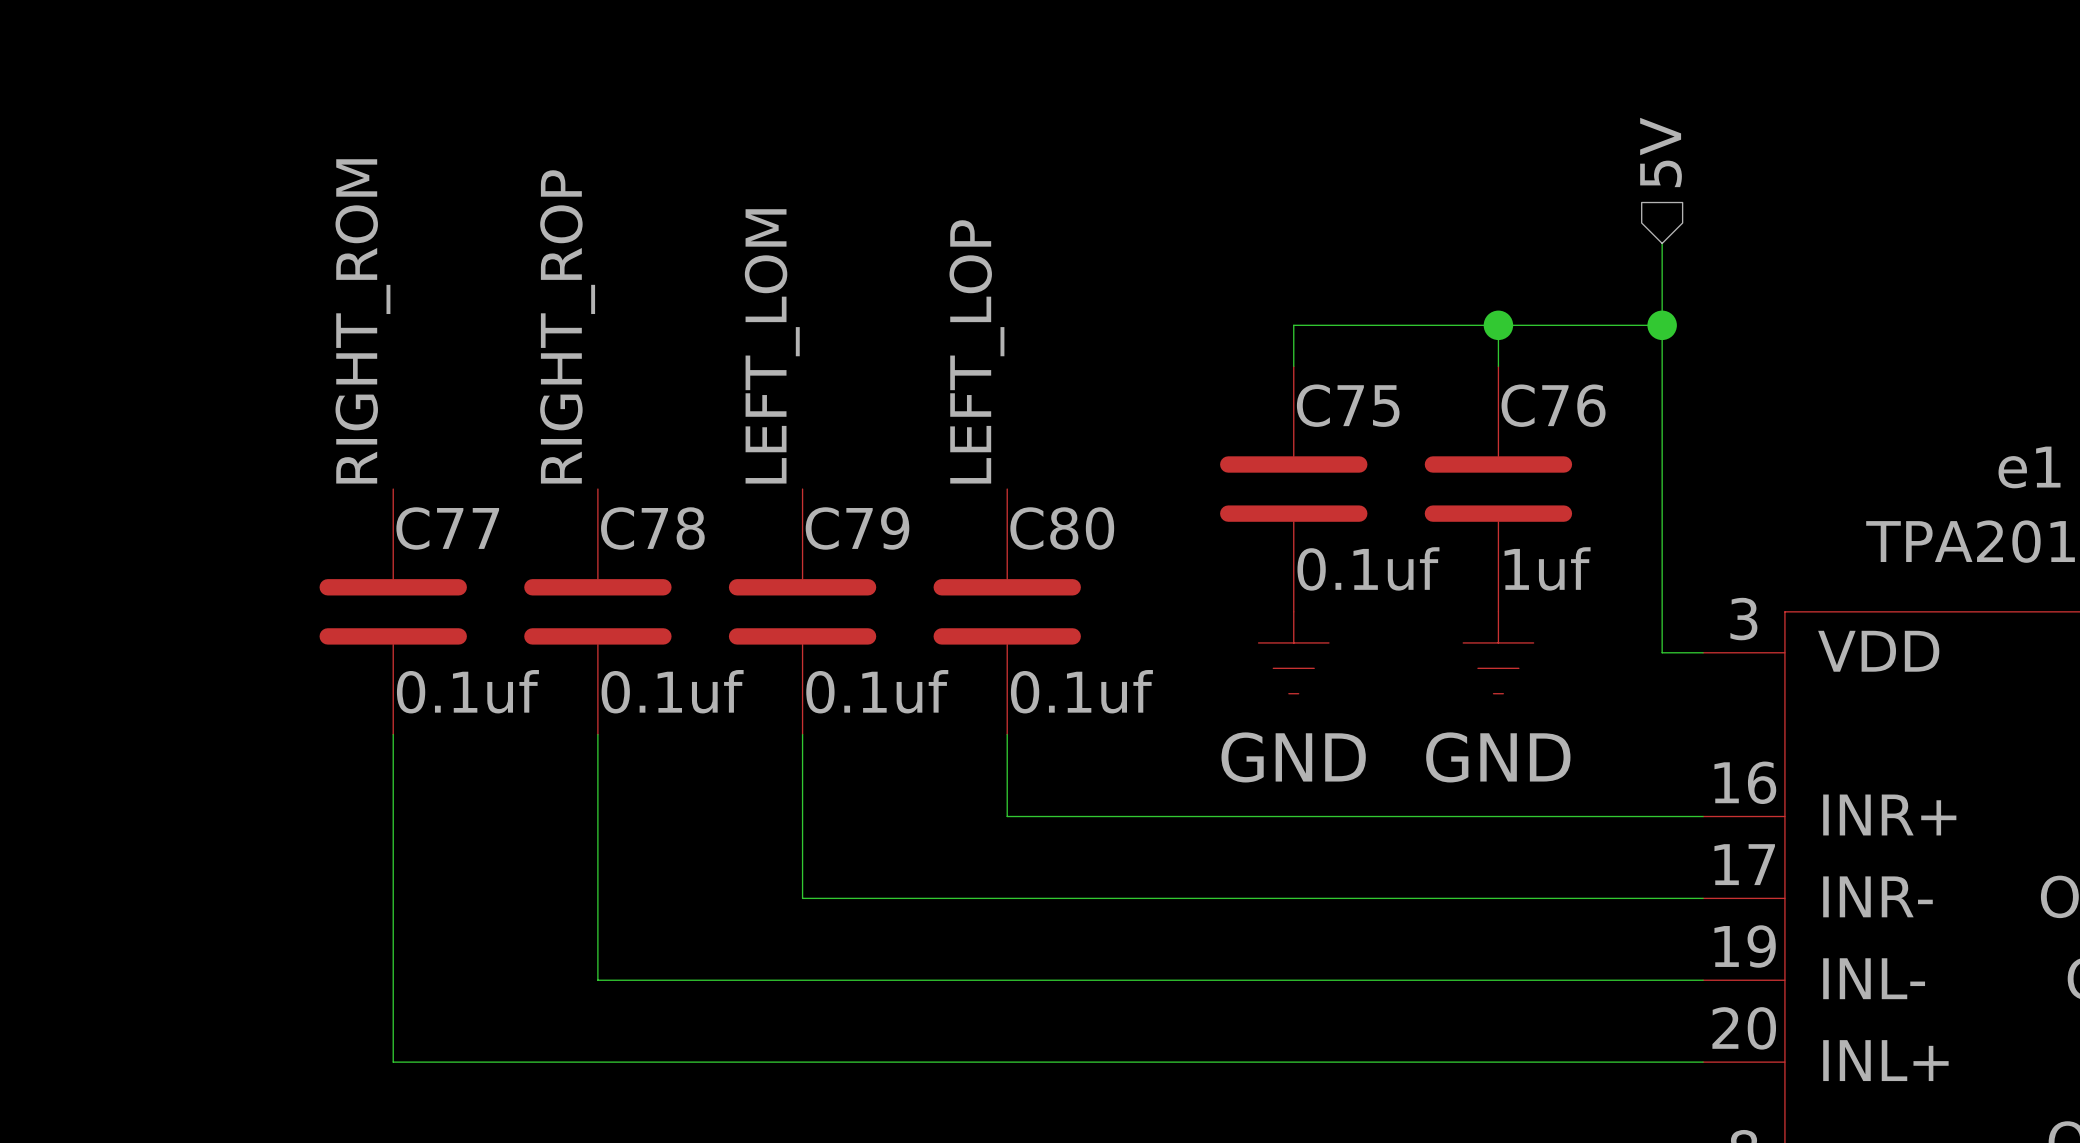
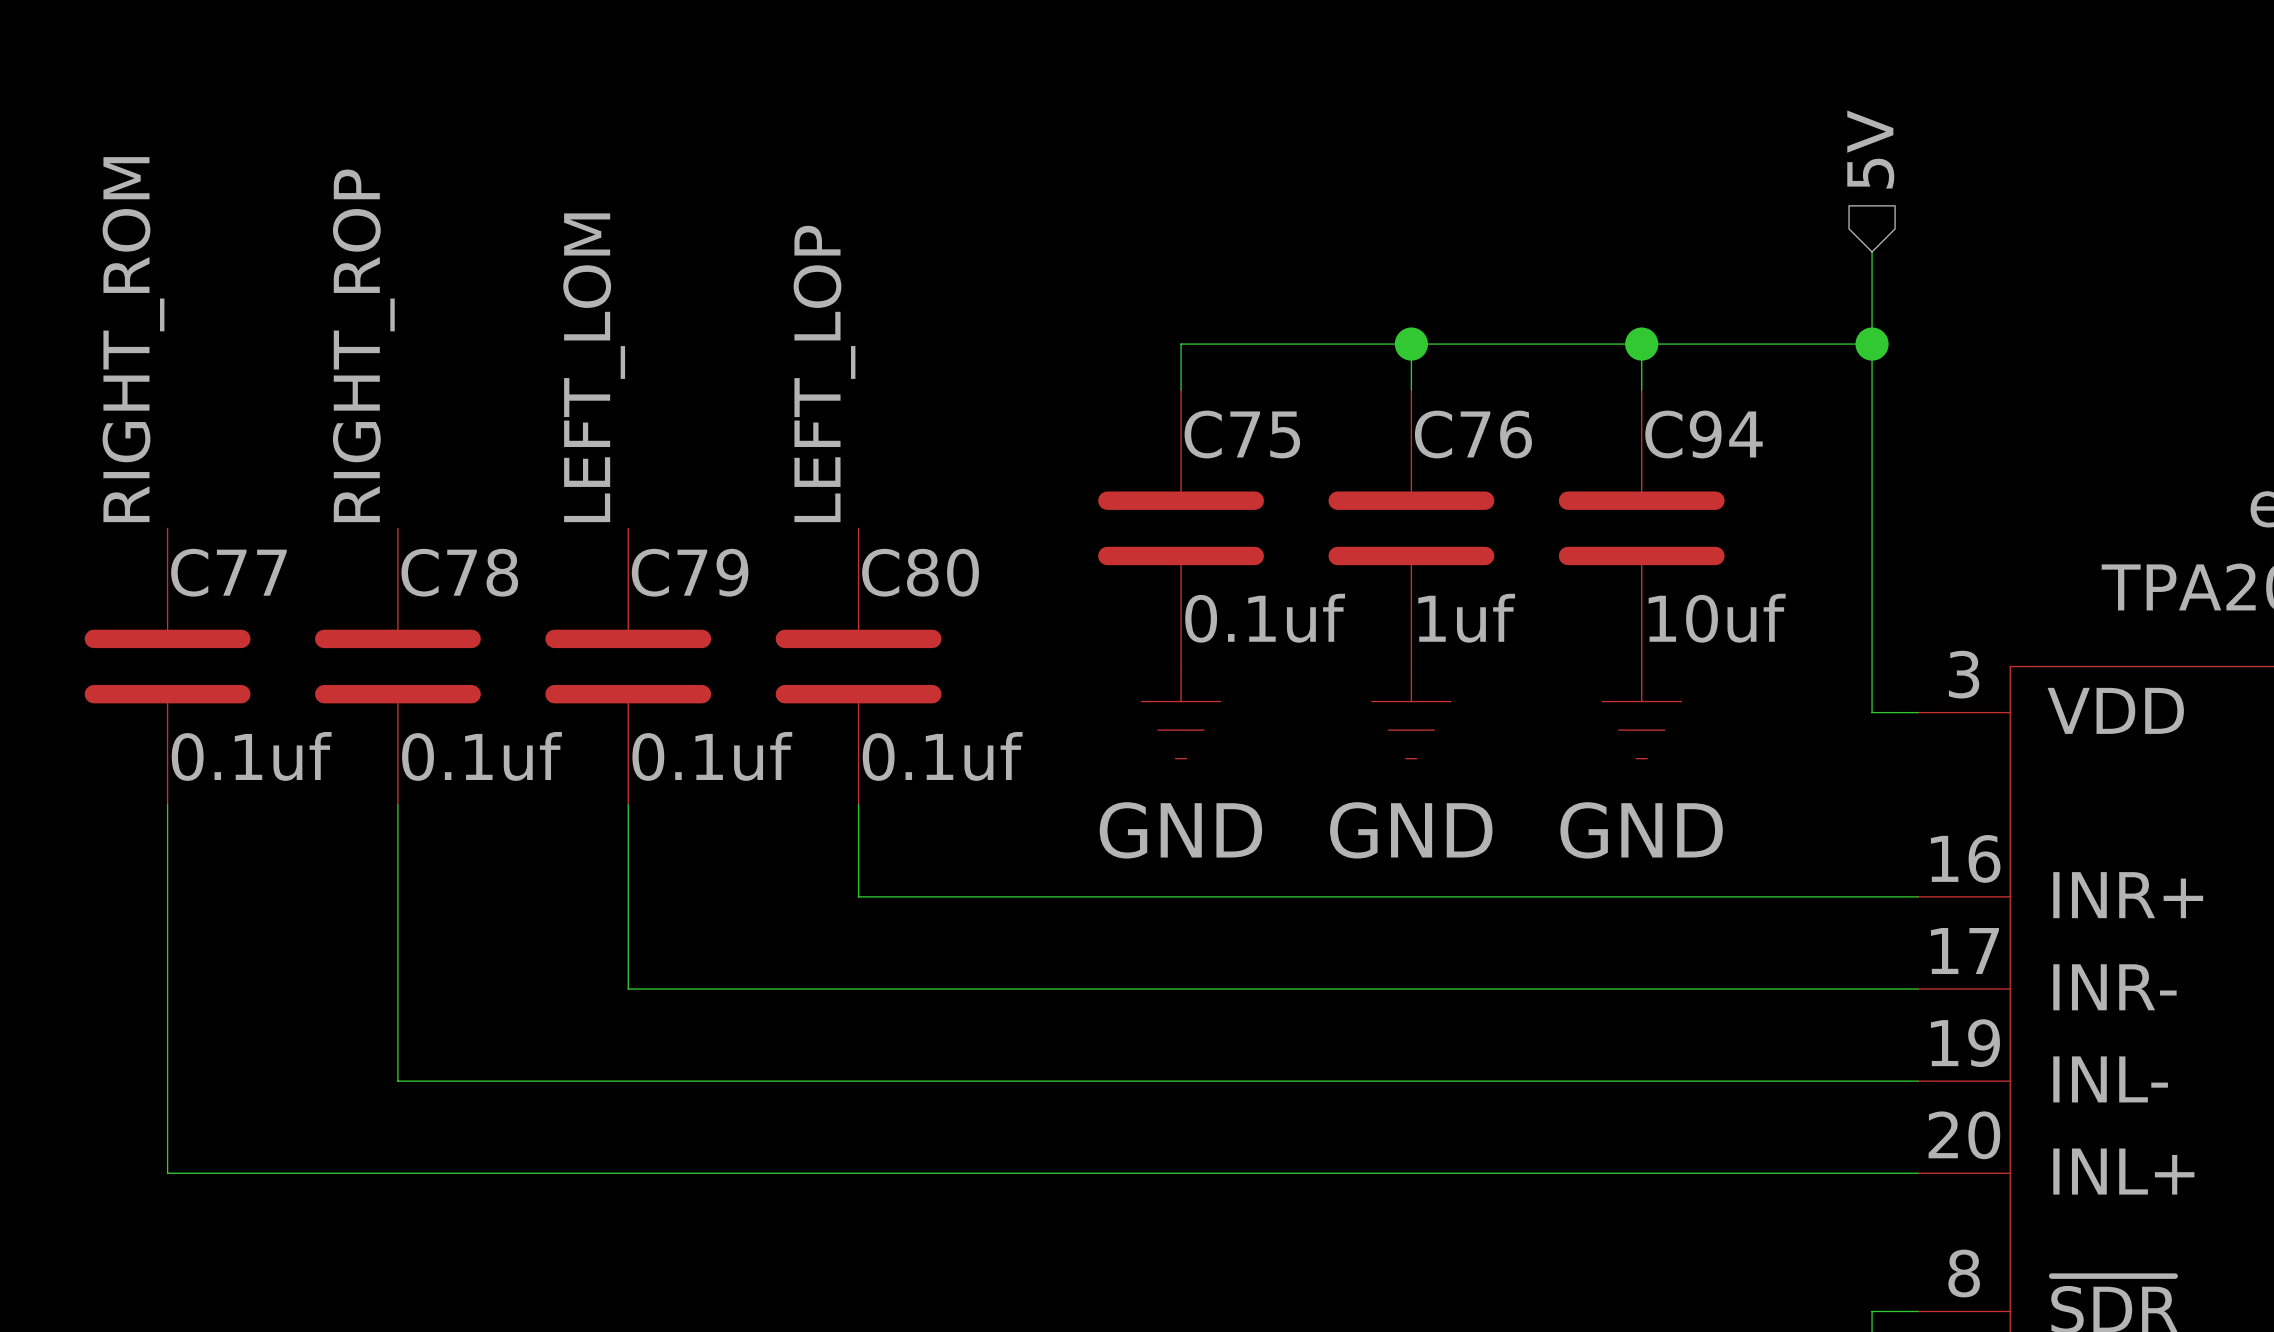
label position: RIGHT_ROM (362, 321) -> RIGHT_ROM (133, 339)
wire: none -> (1411, 344) (1411, 390)
junction: none -> (1411, 344)
wire: (1293, 325) (1293, 366) -> (1457, 344) (1181, 344) (1181, 390)
wire: (1498, 325) (1498, 366) -> (1641, 344) (1641, 390)
junction position: (1498, 325) -> (1641, 344)
label position: RIGHT_ROP (567, 326) -> RIGHT_ROP (363, 345)
label position: LEFT_LOM (772, 346) -> LEFT_LOM (594, 367)
label position: LEFT_LOP (976, 351) -> LEFT_LOP (824, 373)
C75 position: (1293, 489) -> (1181, 528)
C94: none -> 10uf (1641, 528)
C76 position: (1498, 489) -> (1411, 528)
C77 position: (393, 611) -> (167, 666)
C78 position: (597, 611) -> (397, 666)
C79 position: (802, 611) -> (628, 666)
C80 position: (1007, 611) -> (858, 666)
power symbol: none -> GND (1181, 712)
power symbol position: GND (1293, 652) -> GND (1411, 712)
power symbol position: GND (1498, 652) -> GND (1641, 712)
wire: (393, 734) (393, 1062) -> (167, 804) (167, 1173) (443, 1173)
wire: (597, 734) (597, 980) -> (397, 804) (397, 1081) (674, 1081)
wire: (802, 734) (802, 898) -> (628, 804) (628, 989) (904, 989)
wire: (1007, 734) (1007, 816) -> (858, 804) (858, 896) (1134, 896)

